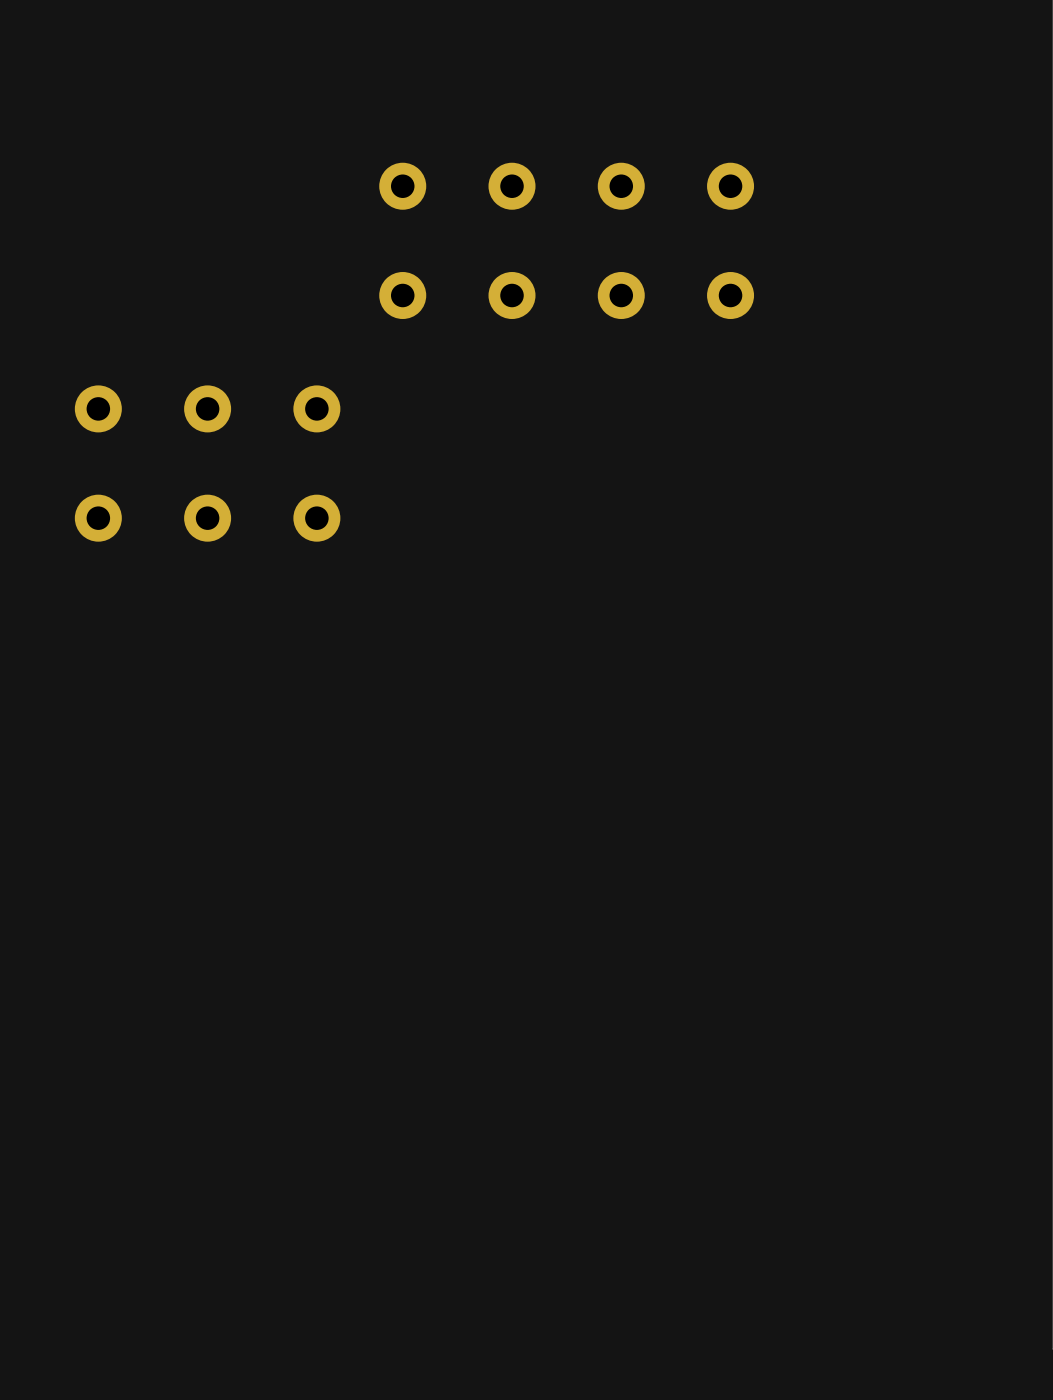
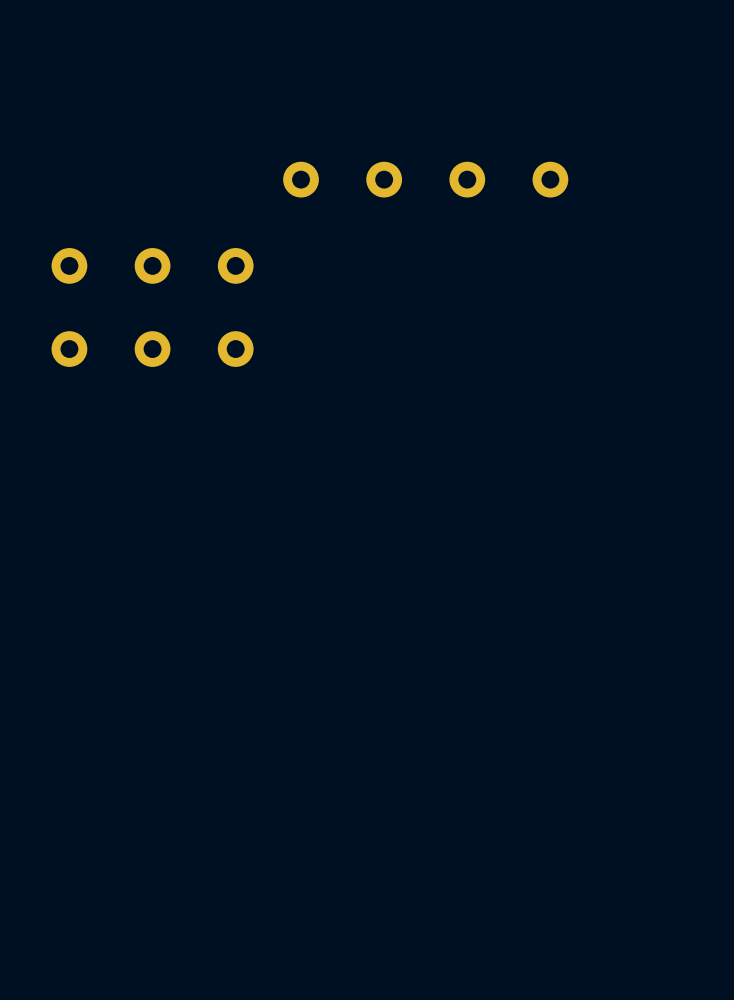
part: (402, 186) -> none
part: (512, 186) -> none
part: (621, 186) -> none
part: (730, 186) -> none

